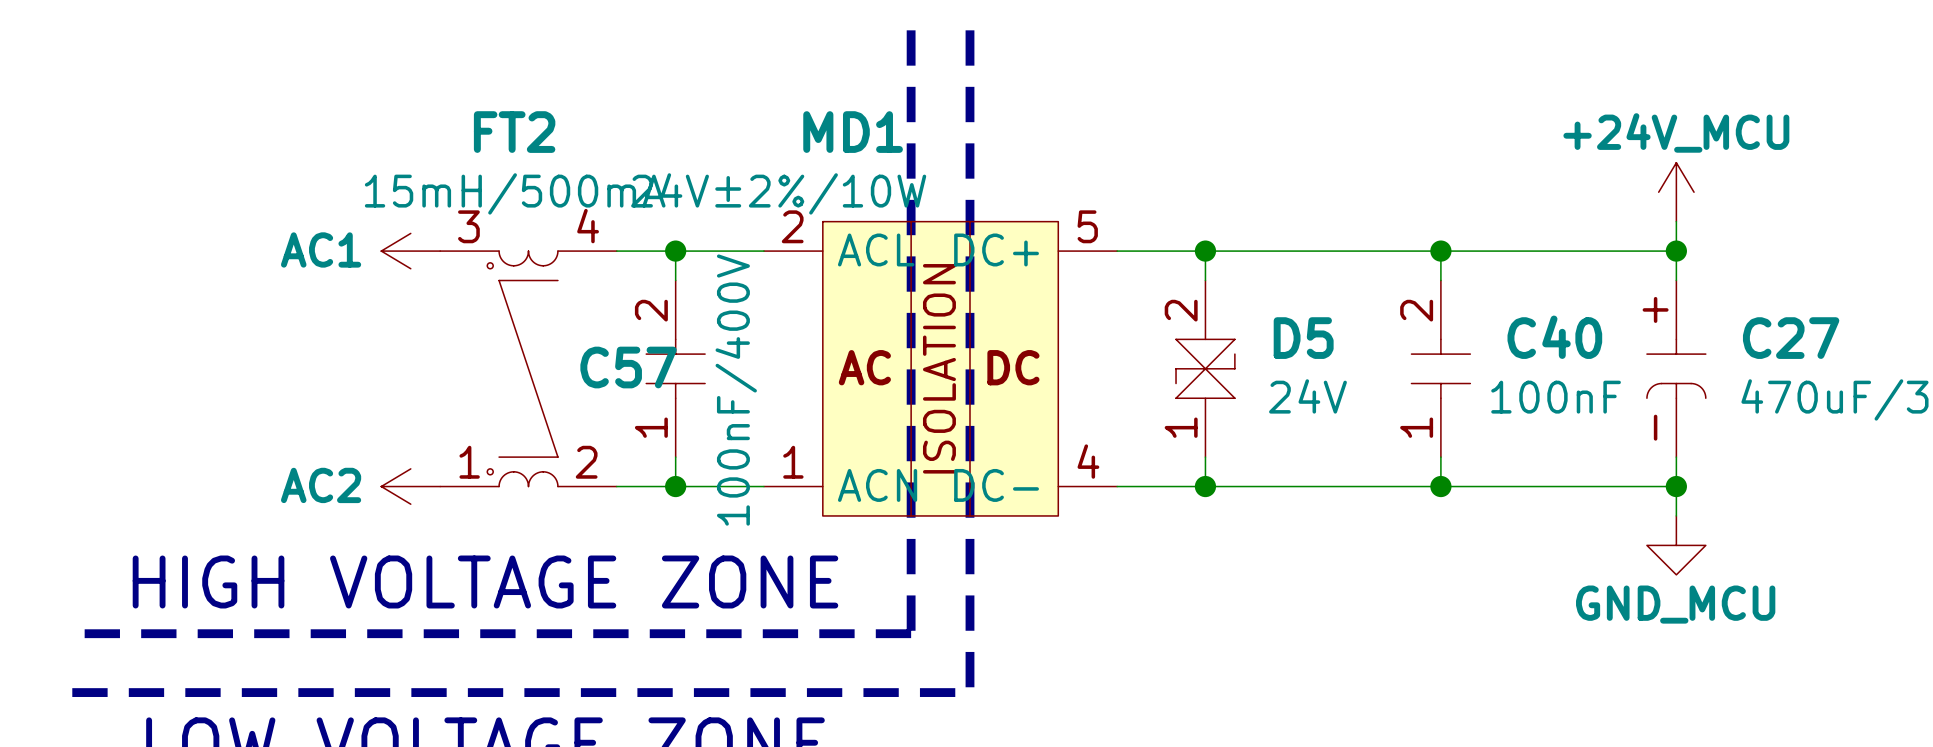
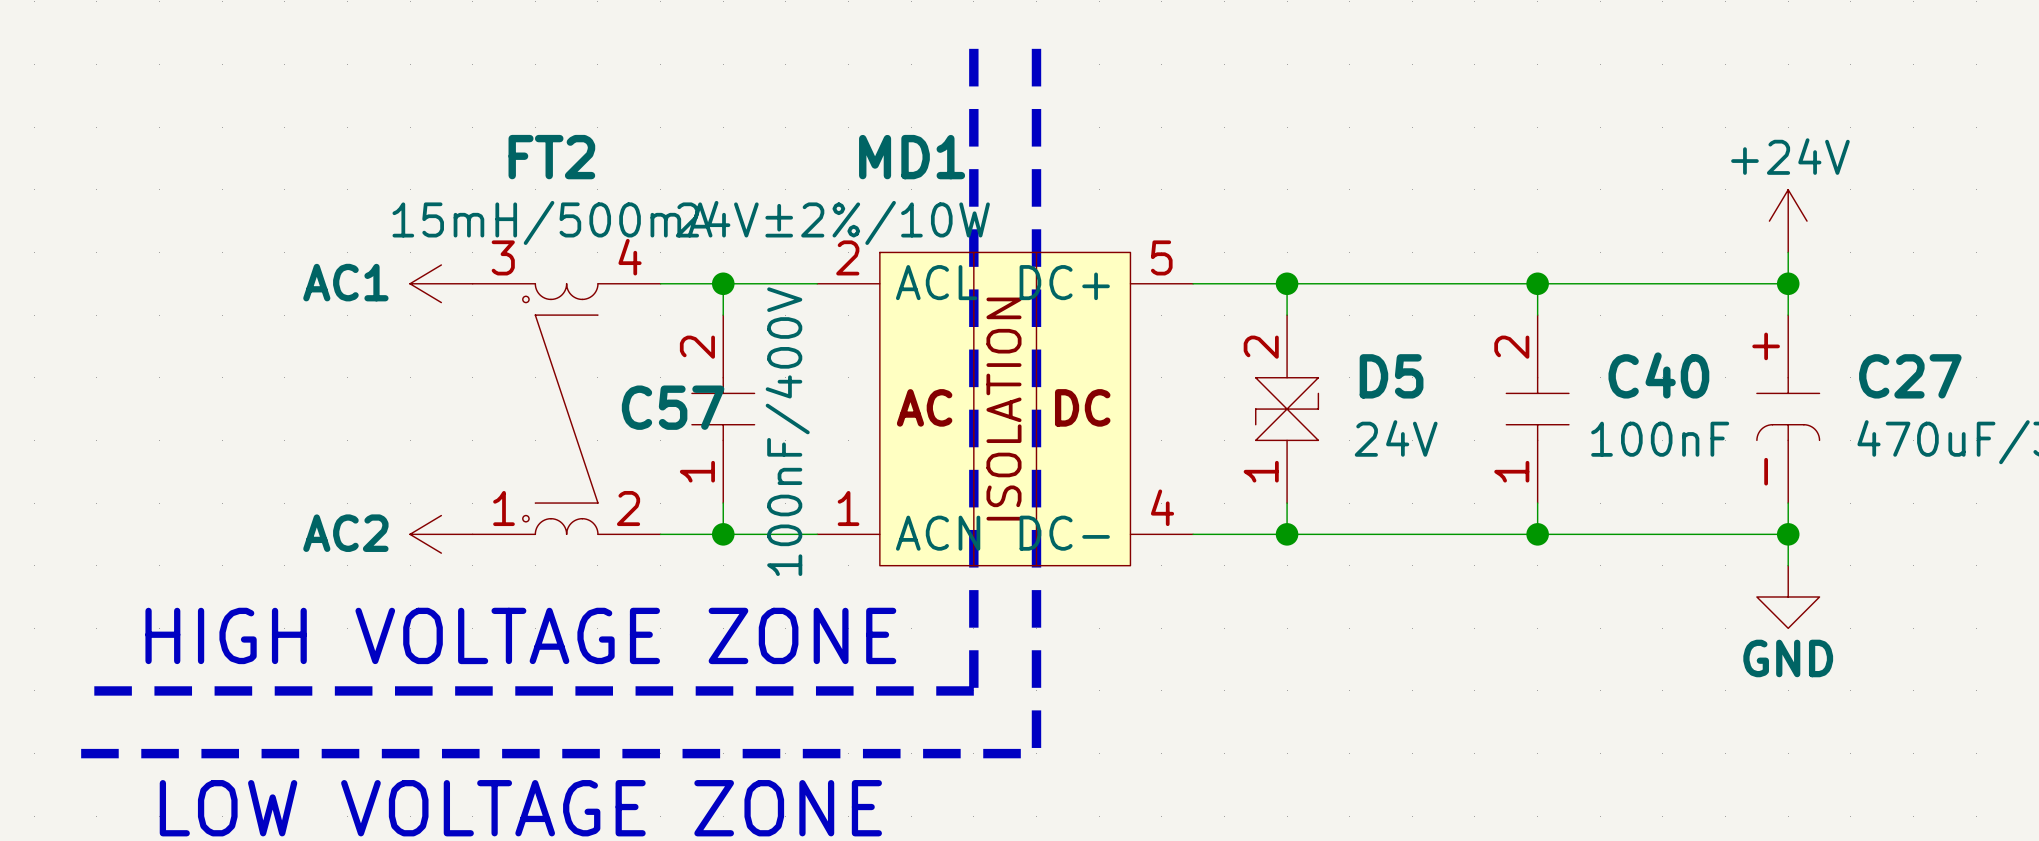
power symbol: +24V_MCU (1676, 192) -> +24V (1788, 221)
power symbol: GND_MCU (1676, 545) -> GND (1788, 596)

